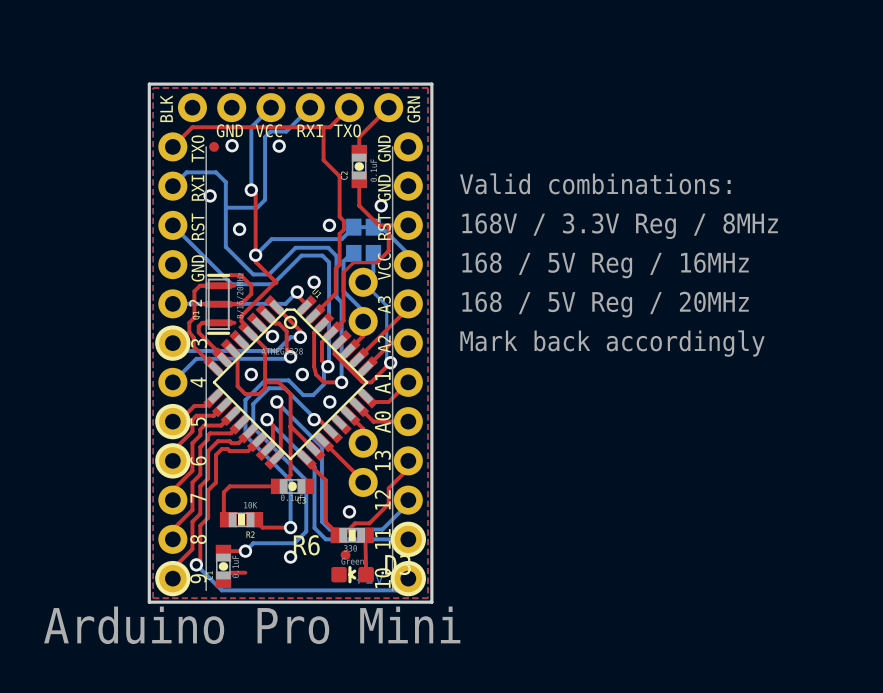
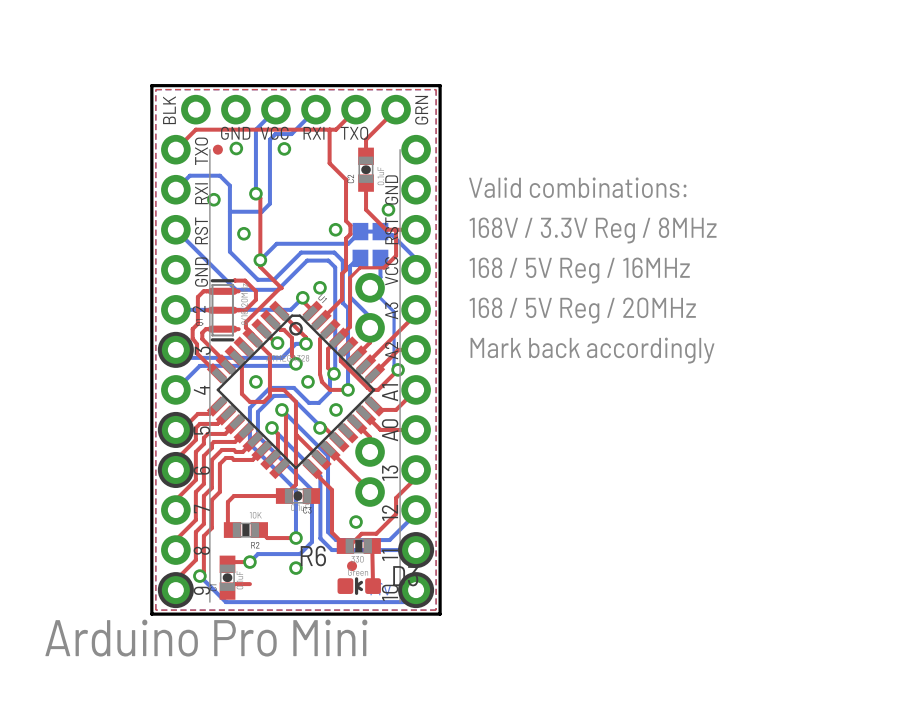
text: GND (384, 148) -> none

